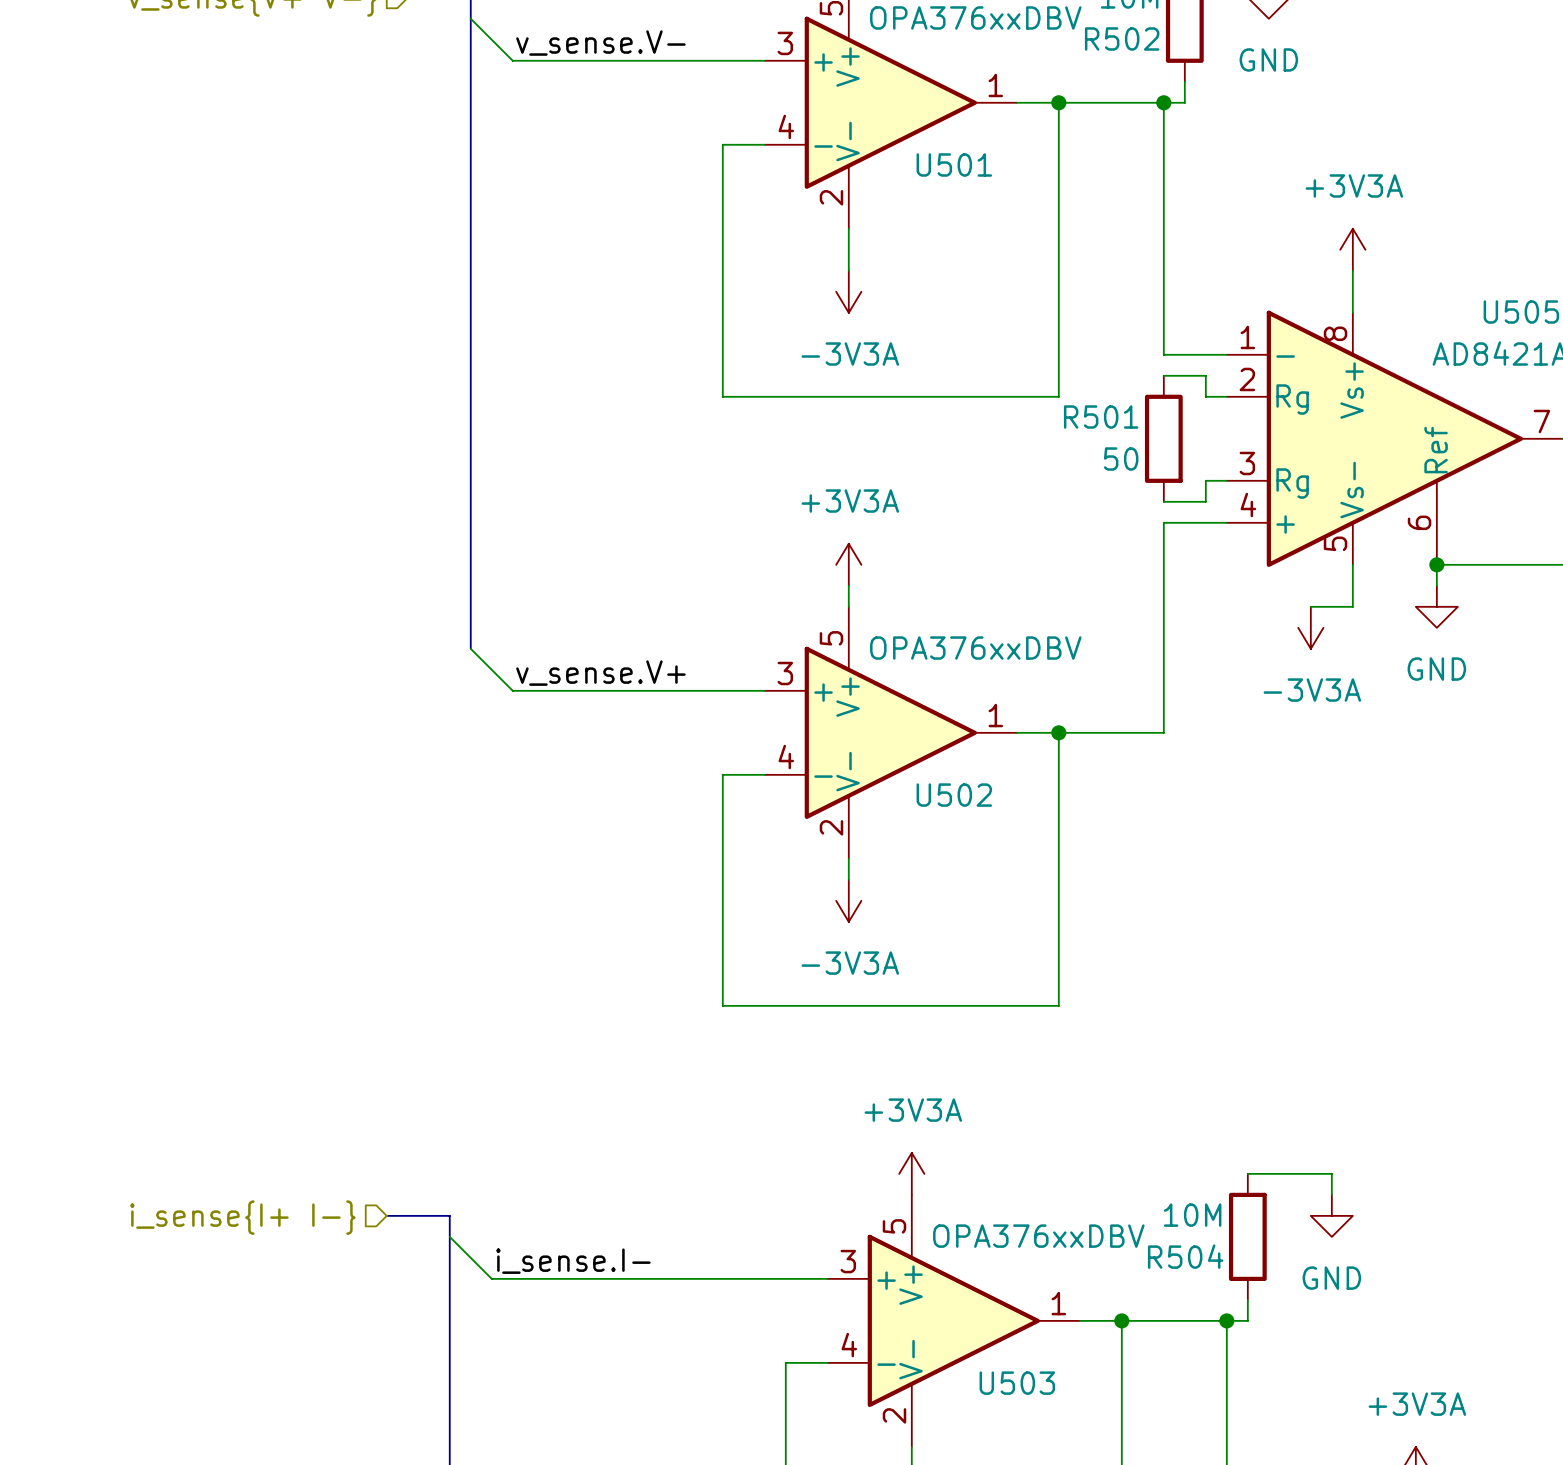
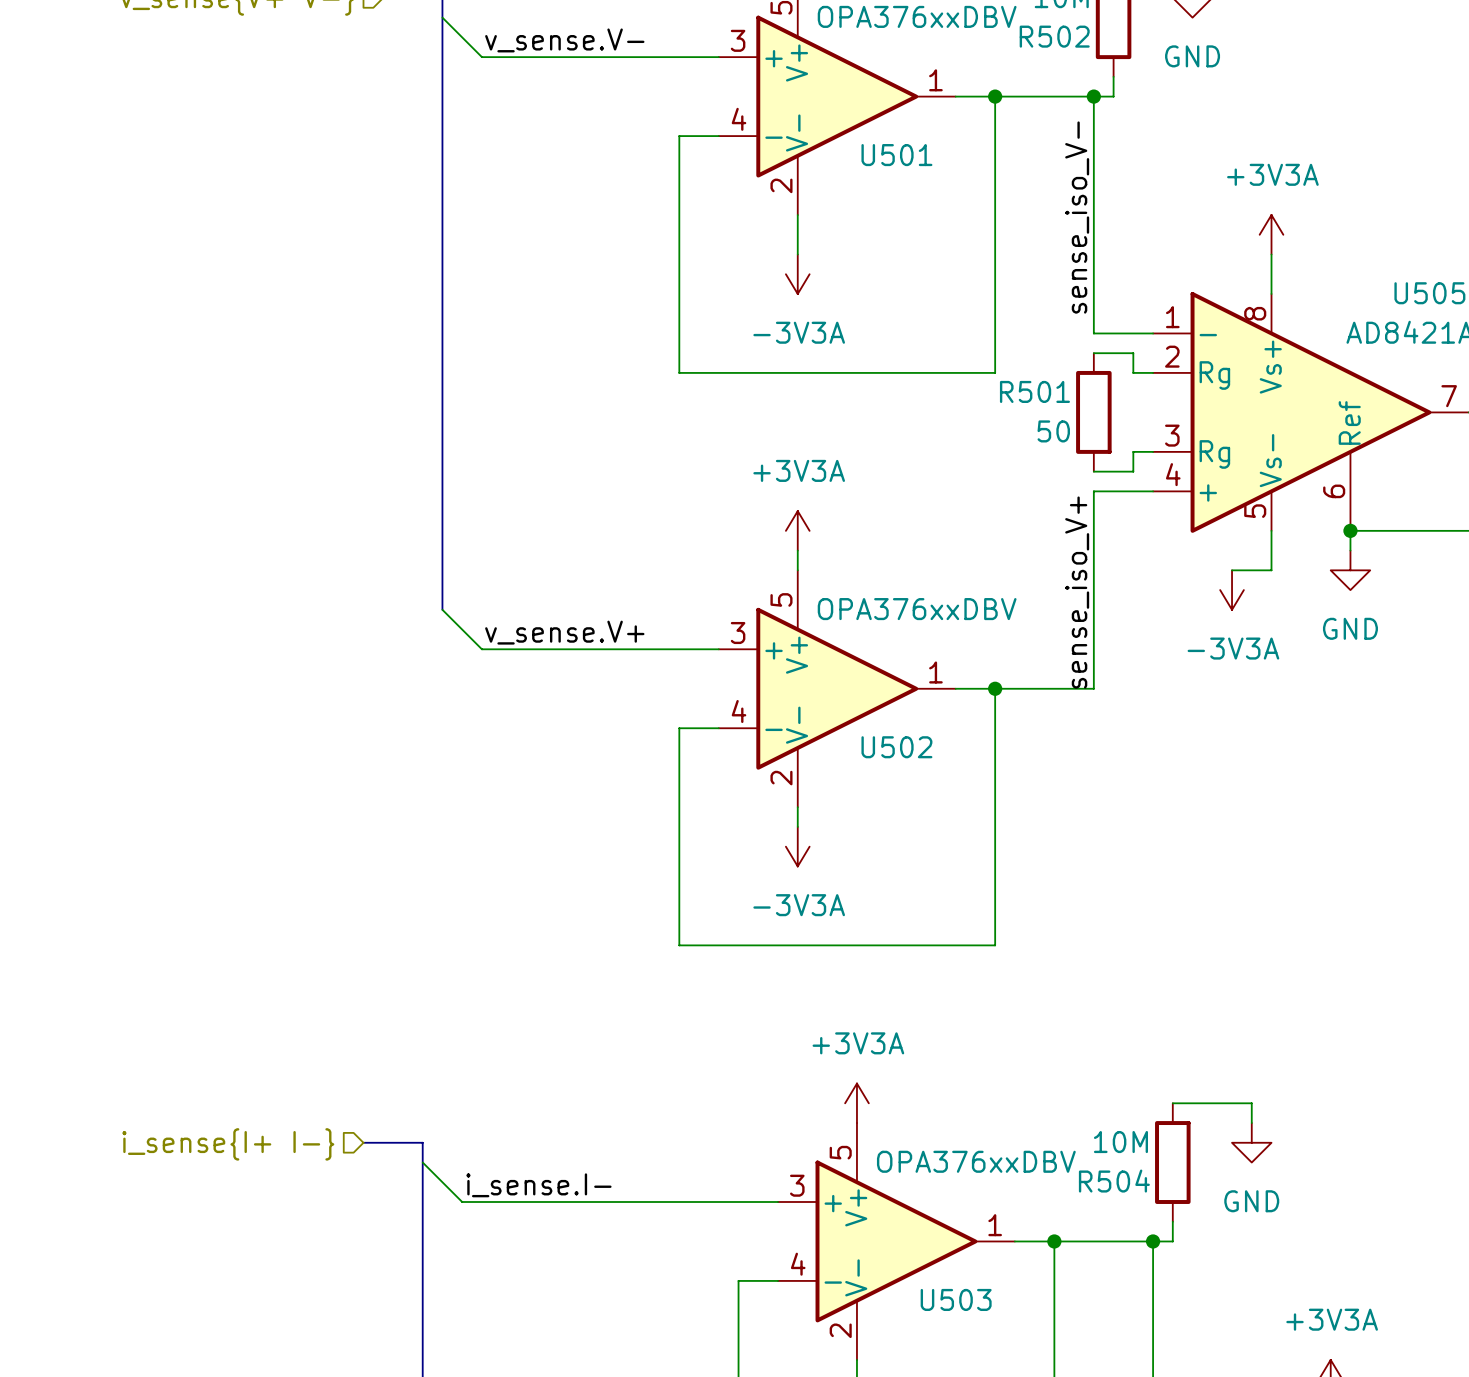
label: none -> sense_iso_V- (1077, 217)
label: none -> sense_iso_V+ (1077, 592)

